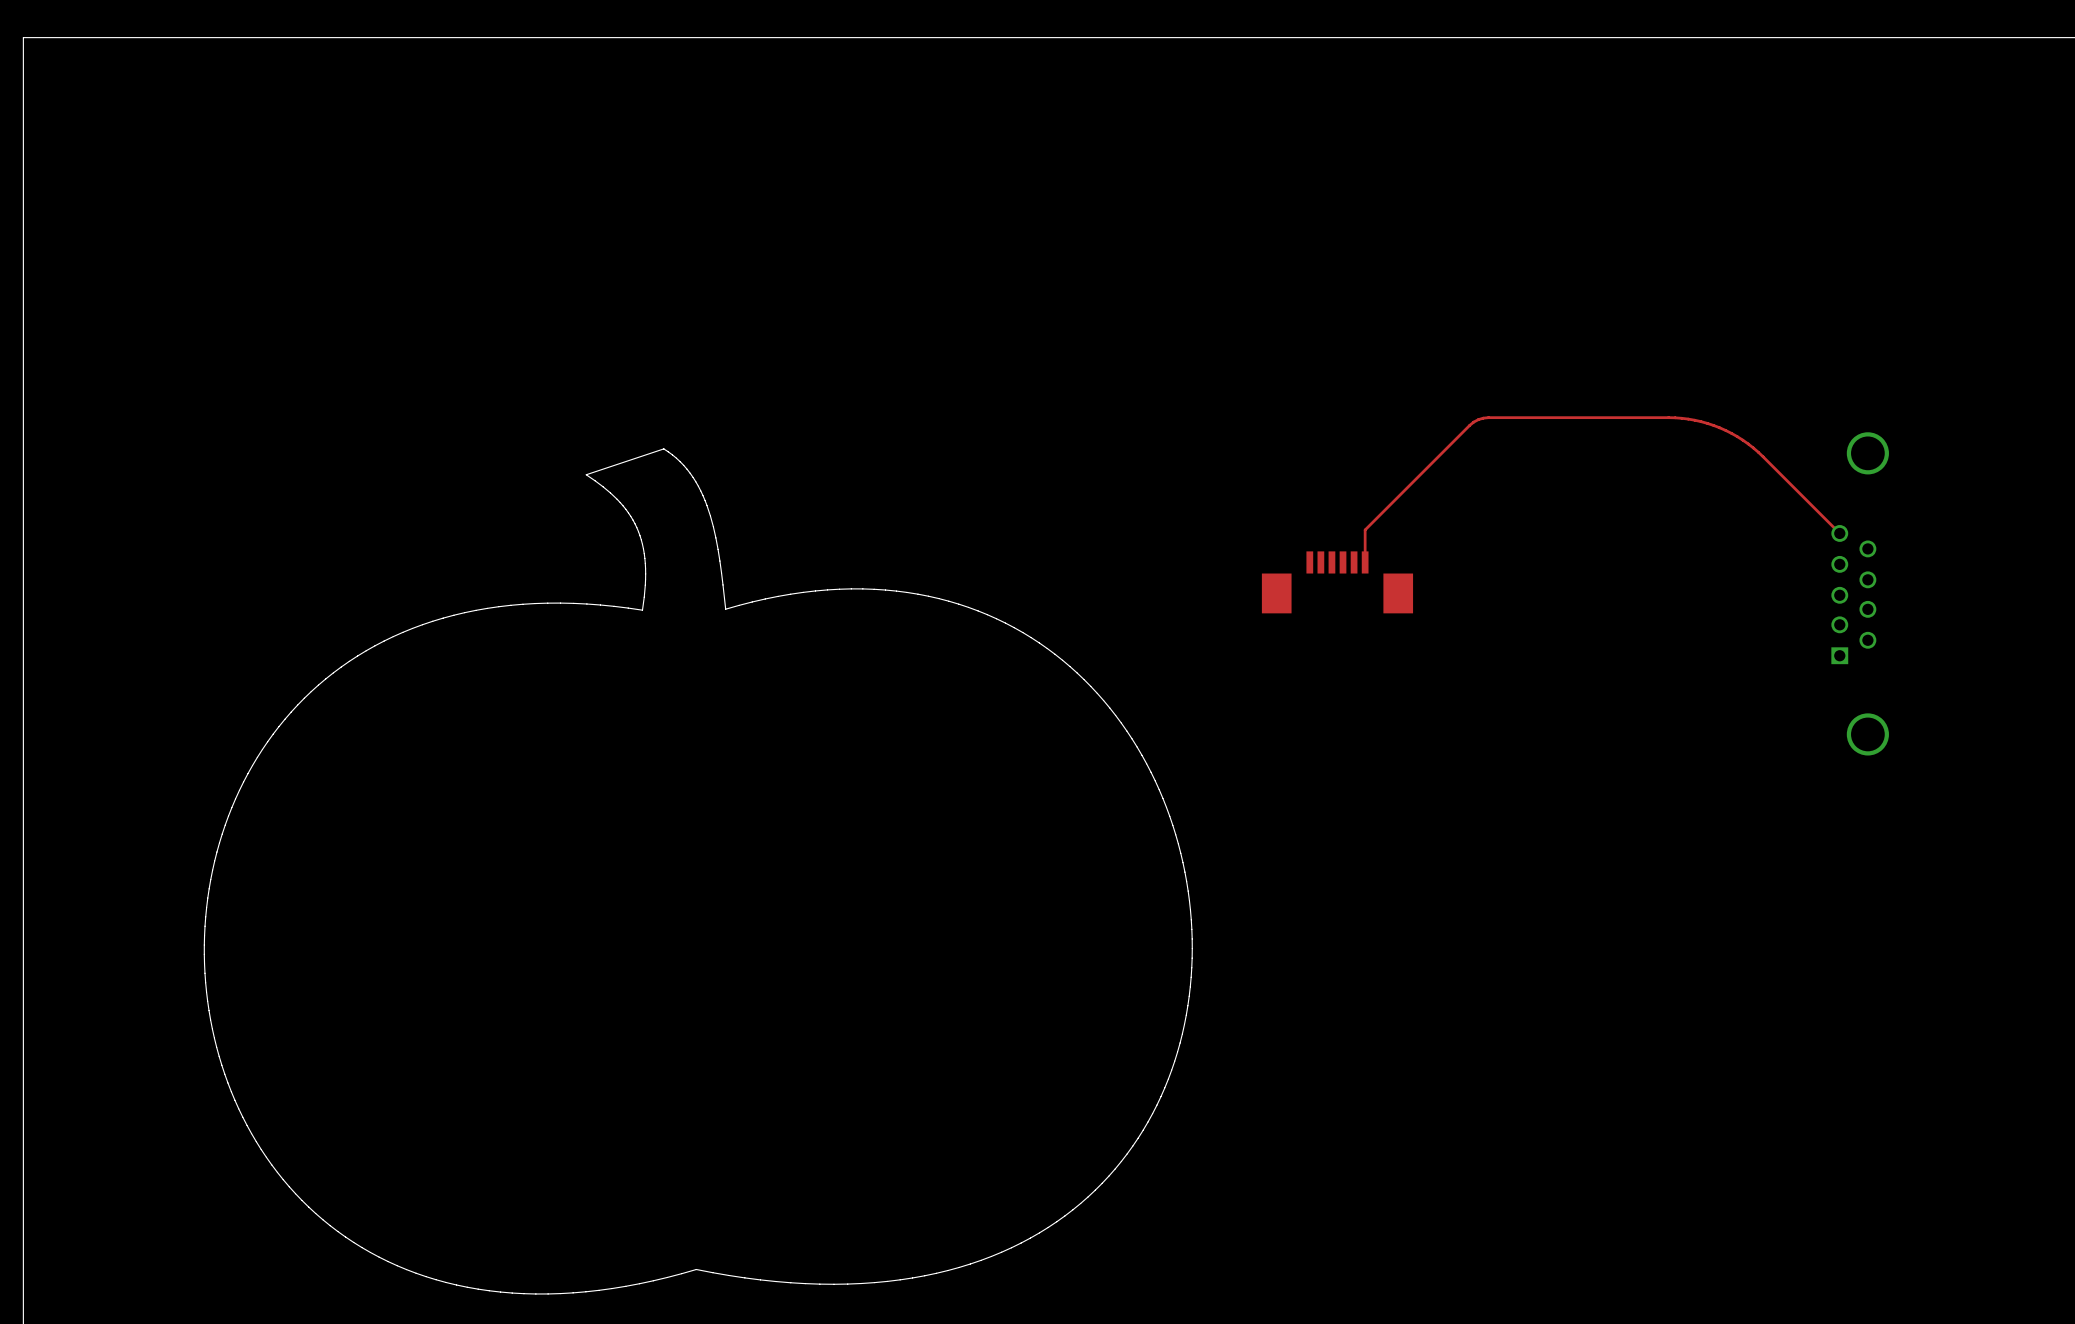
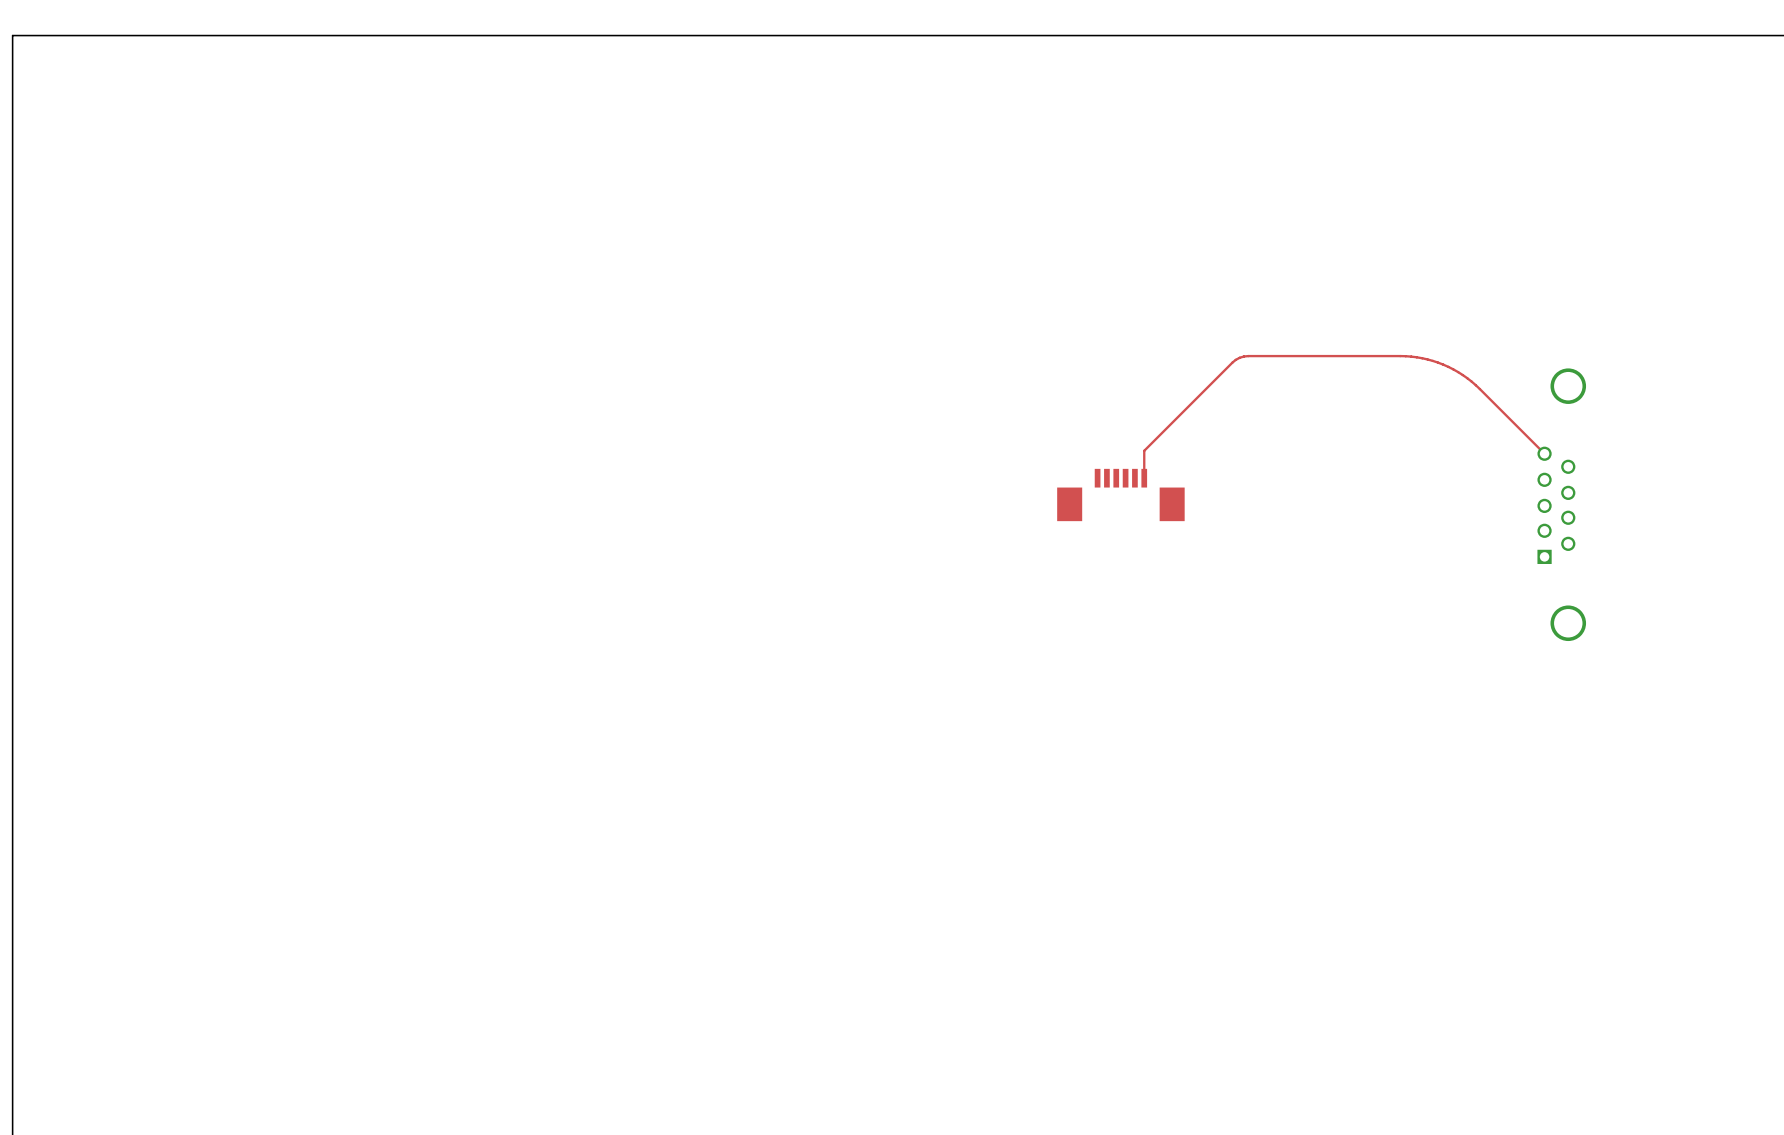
drawing: [203, 448, 1193, 1295] -> none

